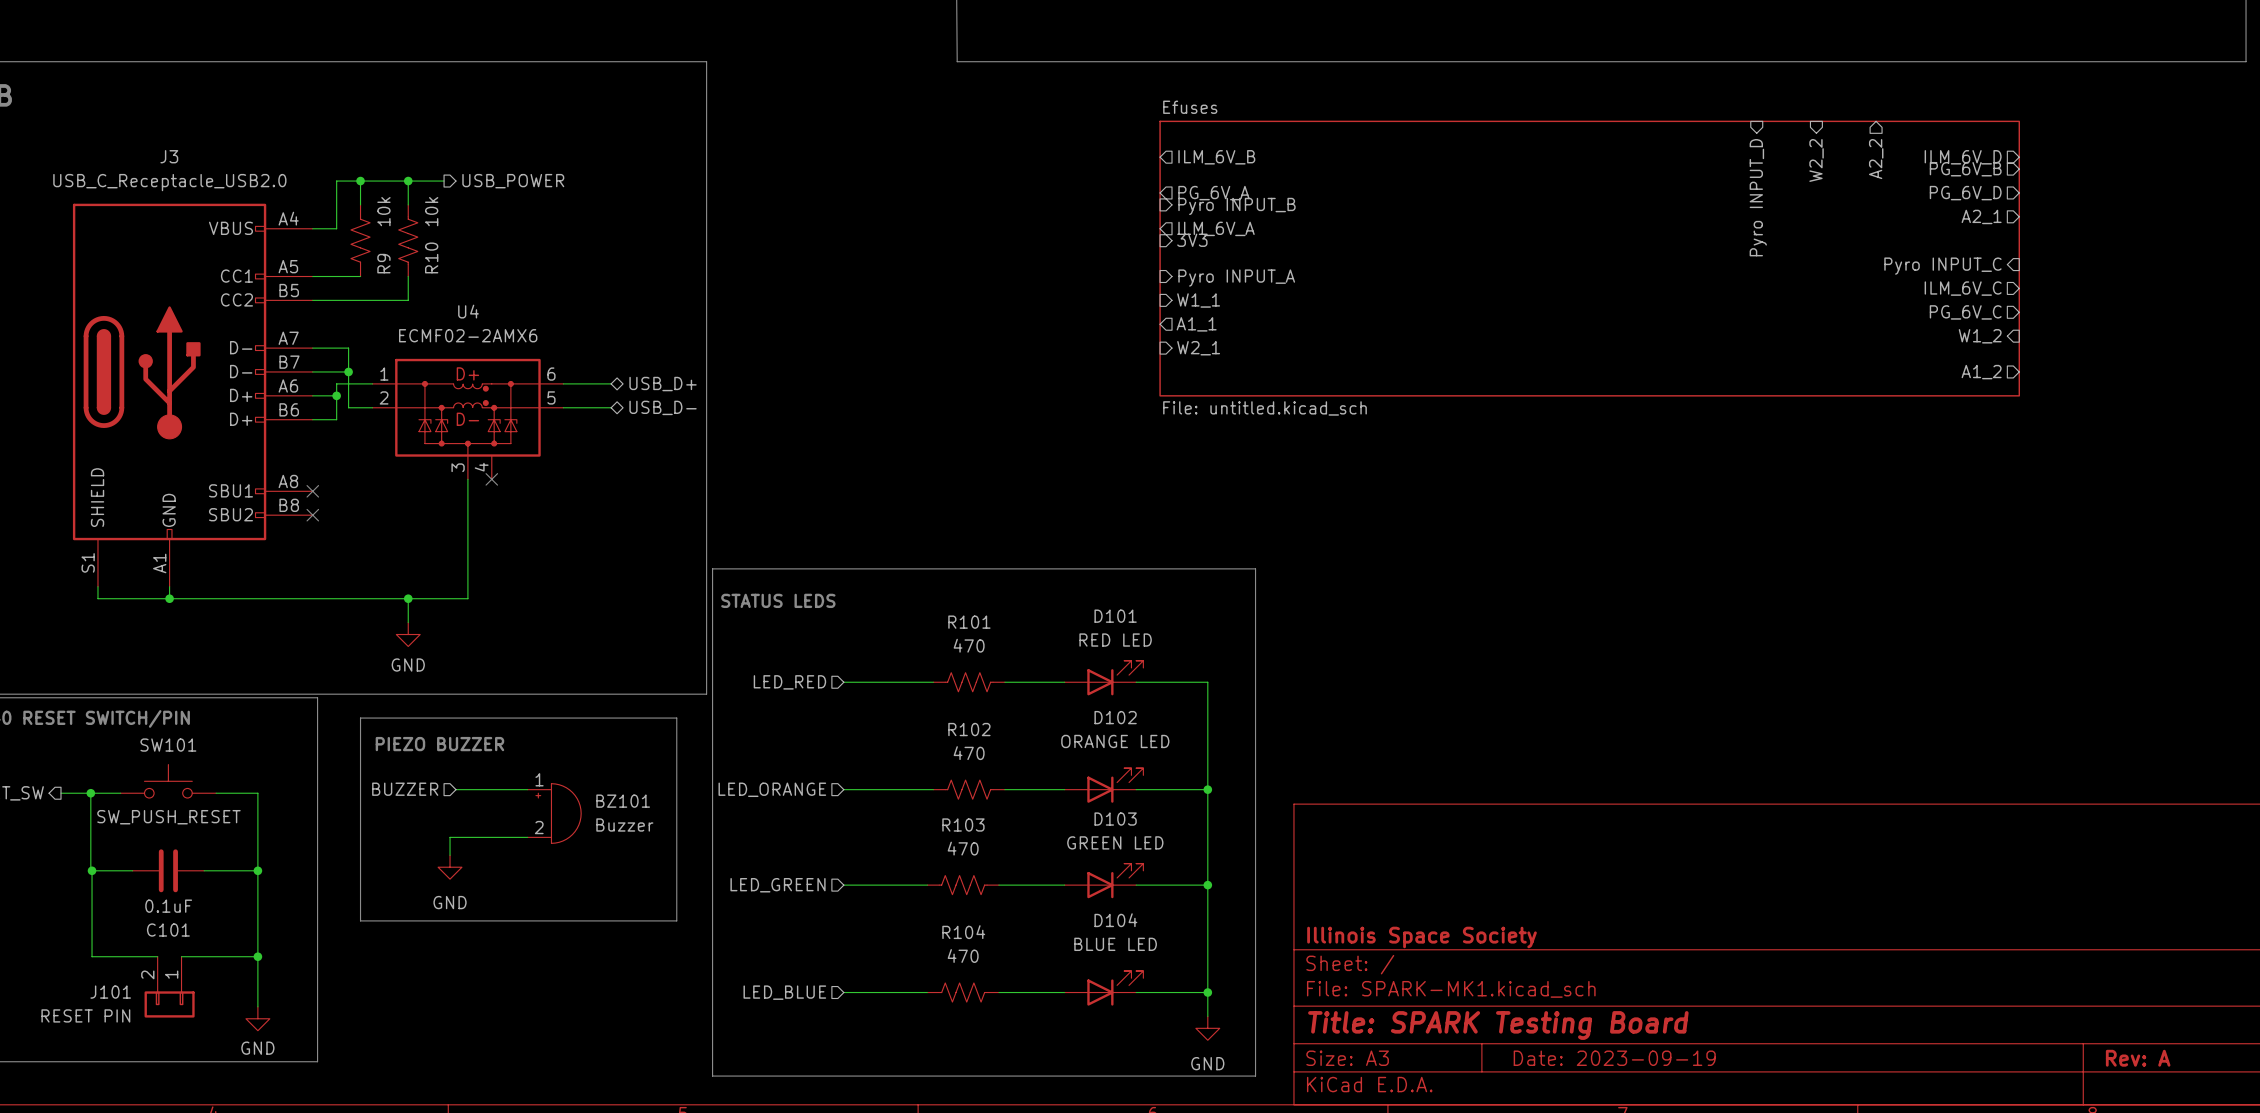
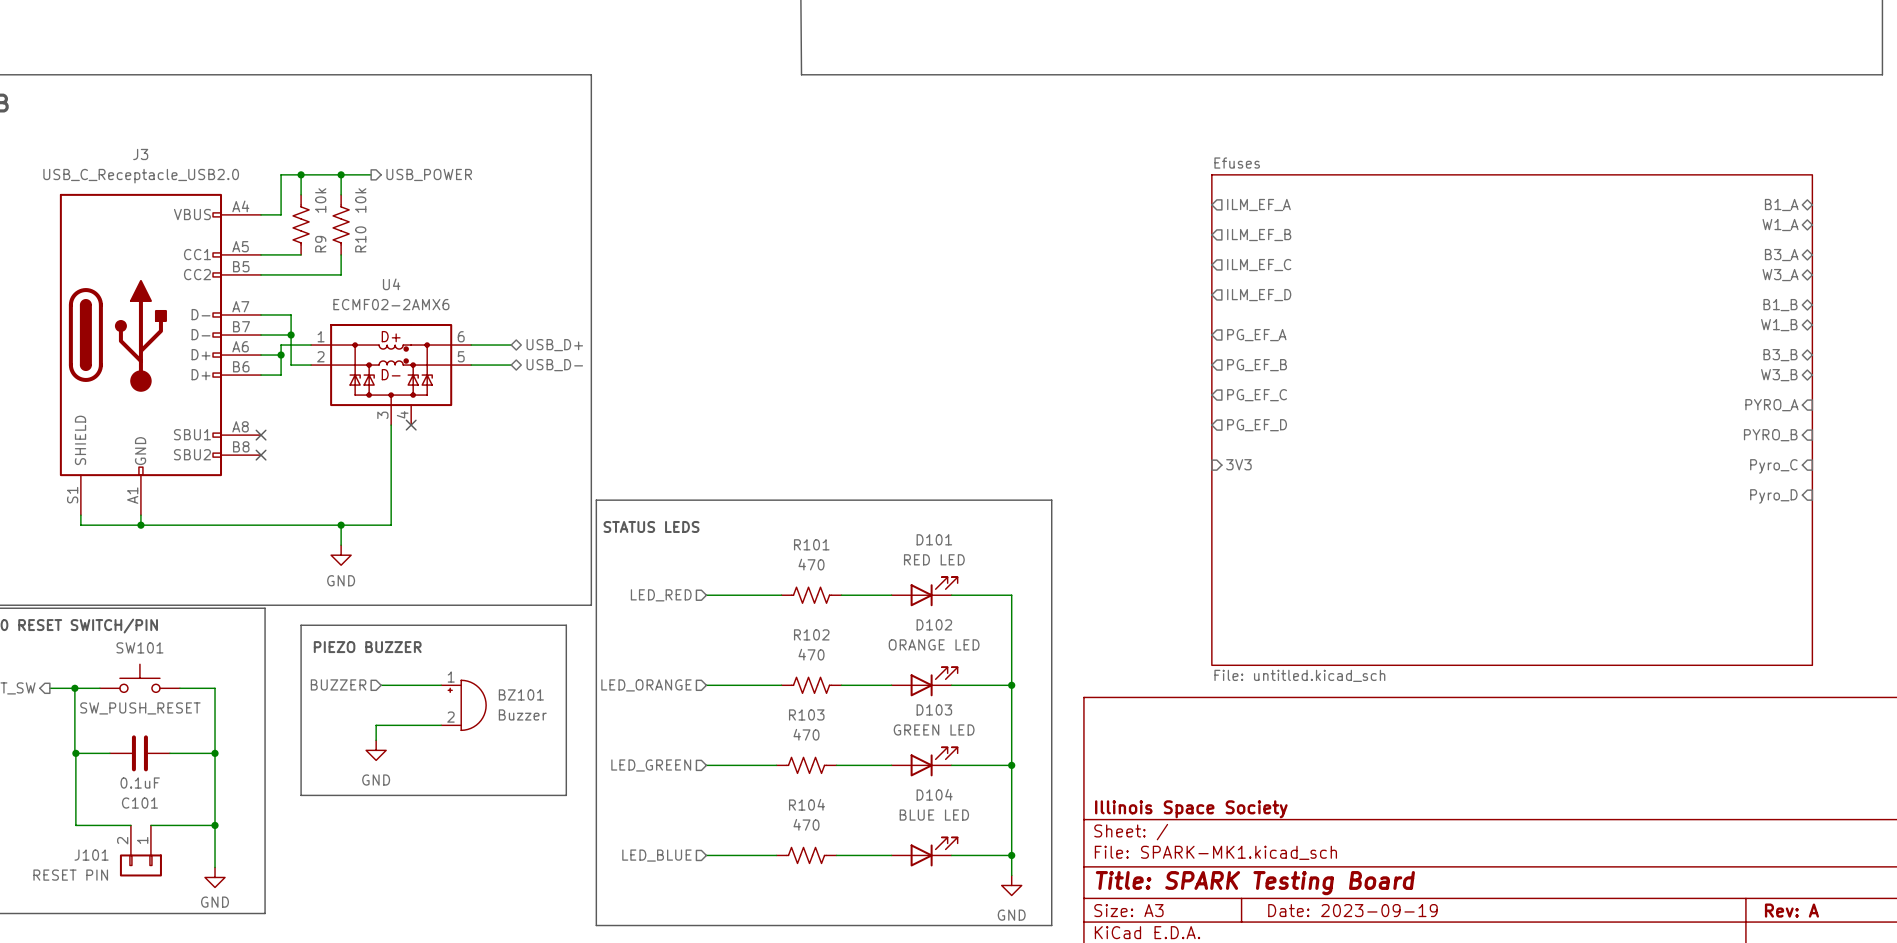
sheet pin: ILM_6V_B (1216, 157) -> none
sheet pin: ILM_6V_D (1963, 157) -> none
sheet pin: A2_2 (1876, 159) -> none
sheet pin: W2_2 (1816, 160) -> none
sheet pin: PG_6V_B (1965, 169) -> none
sheet pin: PG_6V_A (1213, 193) -> none
sheet pin: PG_6V_D (1965, 193) -> none
sheet pin: Pyro INPUT_D (1758, 197) -> none
sheet pin: Pyro INPUT_B (1236, 206) -> none
sheet pin: none -> ILM_EF_A (1258, 205)
sheet pin: A2_1 (1981, 216) -> none
sheet pin: none -> B1_A (1781, 205)
sheet pin: ILM_6V_A (1216, 228) -> none
sheet pin: 3V3 (1192, 240) -> none
sheet pin: none -> W1_A (1780, 225)
sheet pin: none -> ILM_EF_B (1259, 235)
sheet Efuses: File: untitled.kicad_sch (1589, 258) -> none
sheet pin: Pyro INPUT_C (1942, 266) -> none
sheet pin: none -> B3_A (1781, 255)
sheet pin: Pyro INPUT_A (1236, 278) -> none
sheet pin: none -> ILM_EF_C (1259, 265)
sheet pin: ILM_6V_C (1963, 288) -> none
sheet pin: W1_1 (1198, 300) -> none
sheet pin: none -> W3_A (1780, 275)
sheet pin: PG_6V_C (1965, 312) -> none
sheet pin: A1_1 (1196, 324) -> none
sheet pin: none -> ILM_EF_D (1259, 295)
sheet pin: W1_2 (1980, 336) -> none
sheet pin: none -> B1_B (1780, 305)
sheet pin: W2_1 (1198, 348) -> none
sheet pin: none -> W1_B (1779, 325)
sheet pin: none -> PG_EF_A (1256, 335)
sheet pin: A1_2 (1981, 372) -> none
sheet pin: none -> B3_B (1780, 355)
sheet pin: none -> PG_EF_B (1257, 365)
sheet pin: none -> W3_B (1779, 375)
sheet pin: none -> PG_EF_C (1257, 395)
sheet pin: none -> PYRO_A (1771, 405)
sheet Efuses: none -> File: untitled.kicad_sch (1512, 420)
sheet pin: none -> PG_EF_D (1257, 425)
sheet pin: none -> PYRO_B (1770, 435)
sheet pin: none -> 3V3 (1238, 464)
sheet pin: none -> Pyro_C (1773, 466)
sheet pin: none -> Pyro_D (1773, 496)

